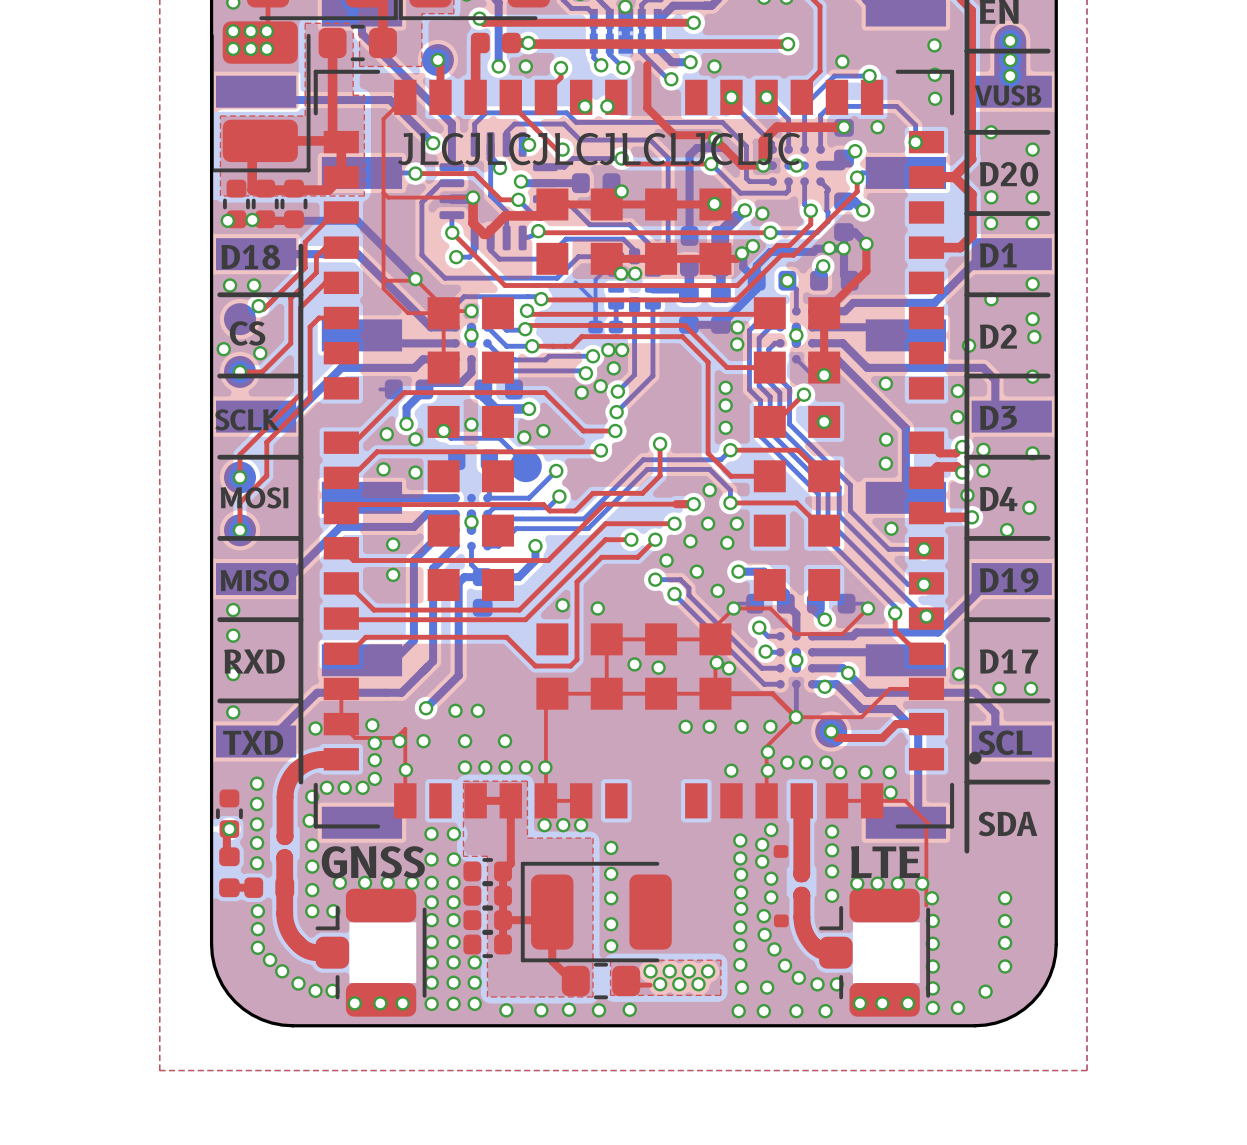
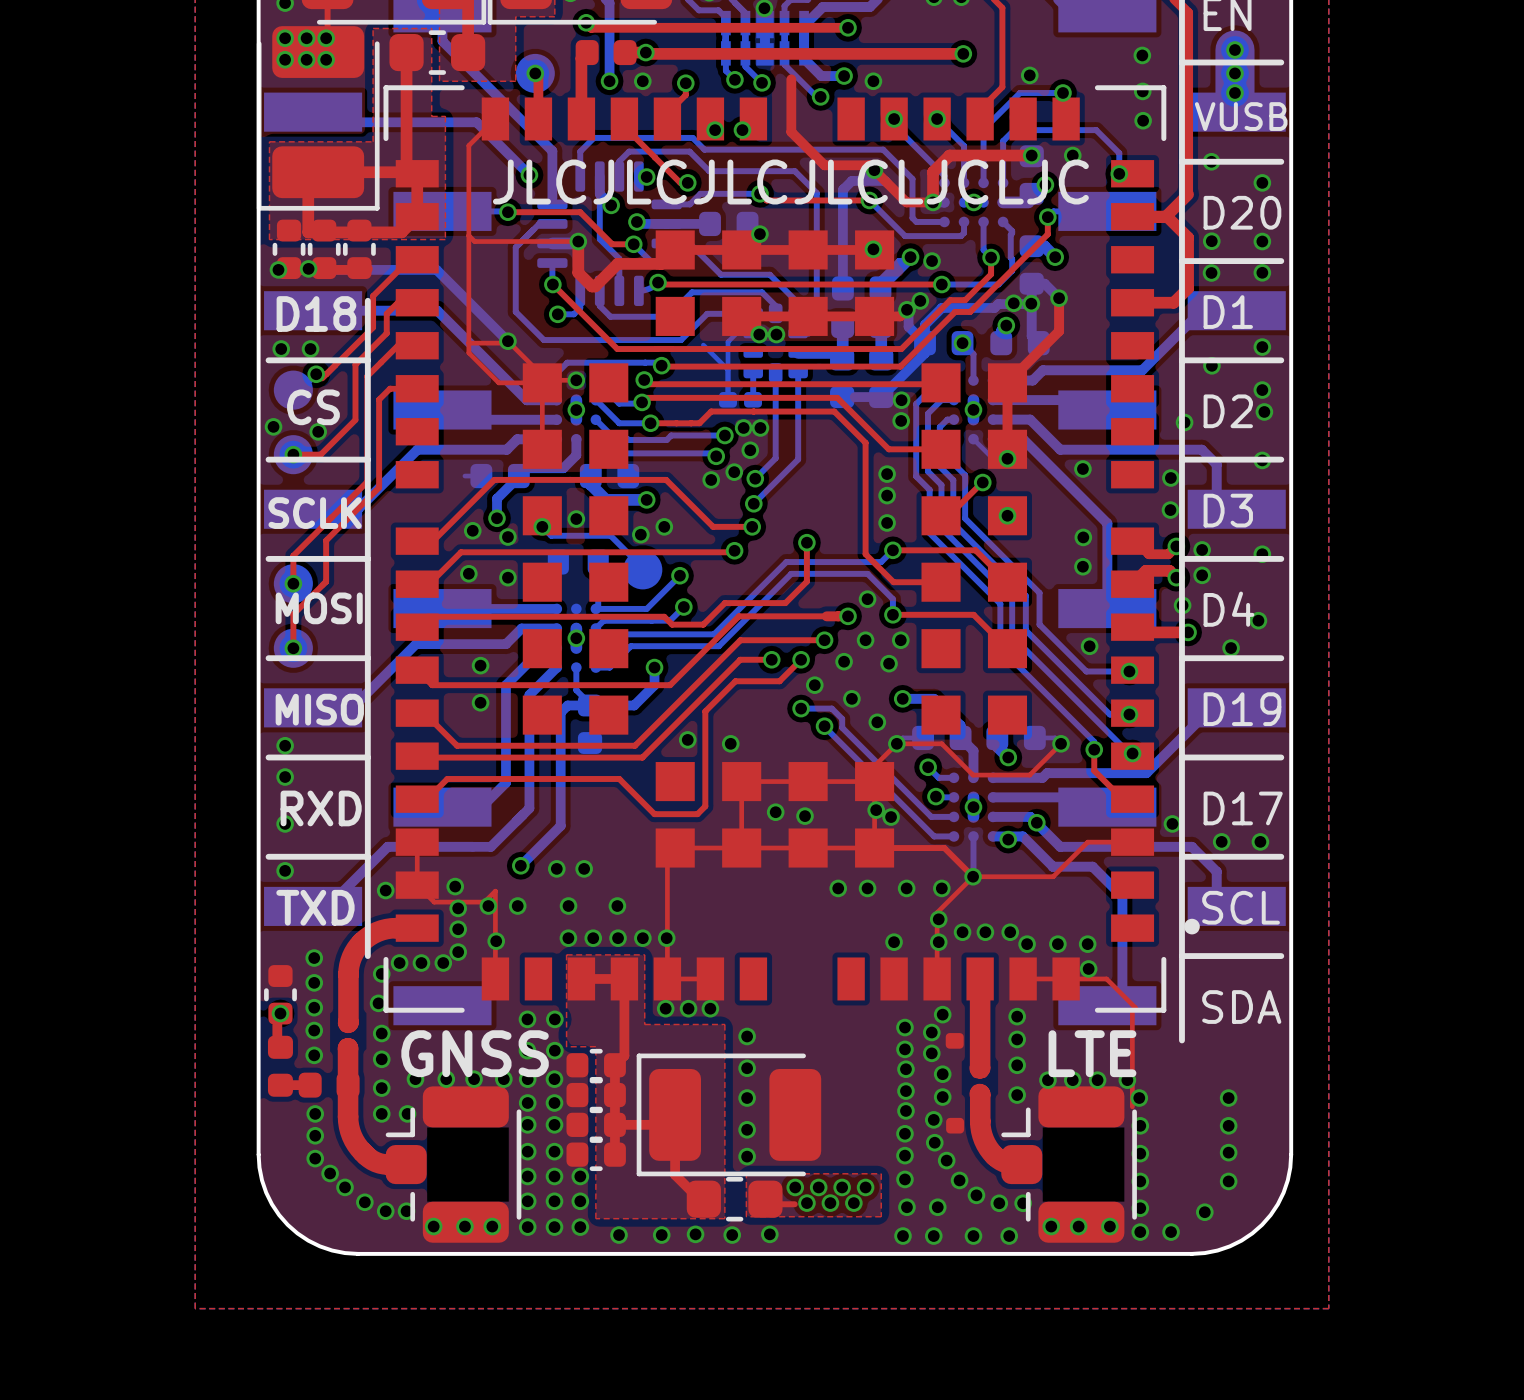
top track: (926, 724) (896, 724) (882, 737) (837, 737) (831, 731) -> none
part: (831, 731) -> none
via: (831, 731) -> none

